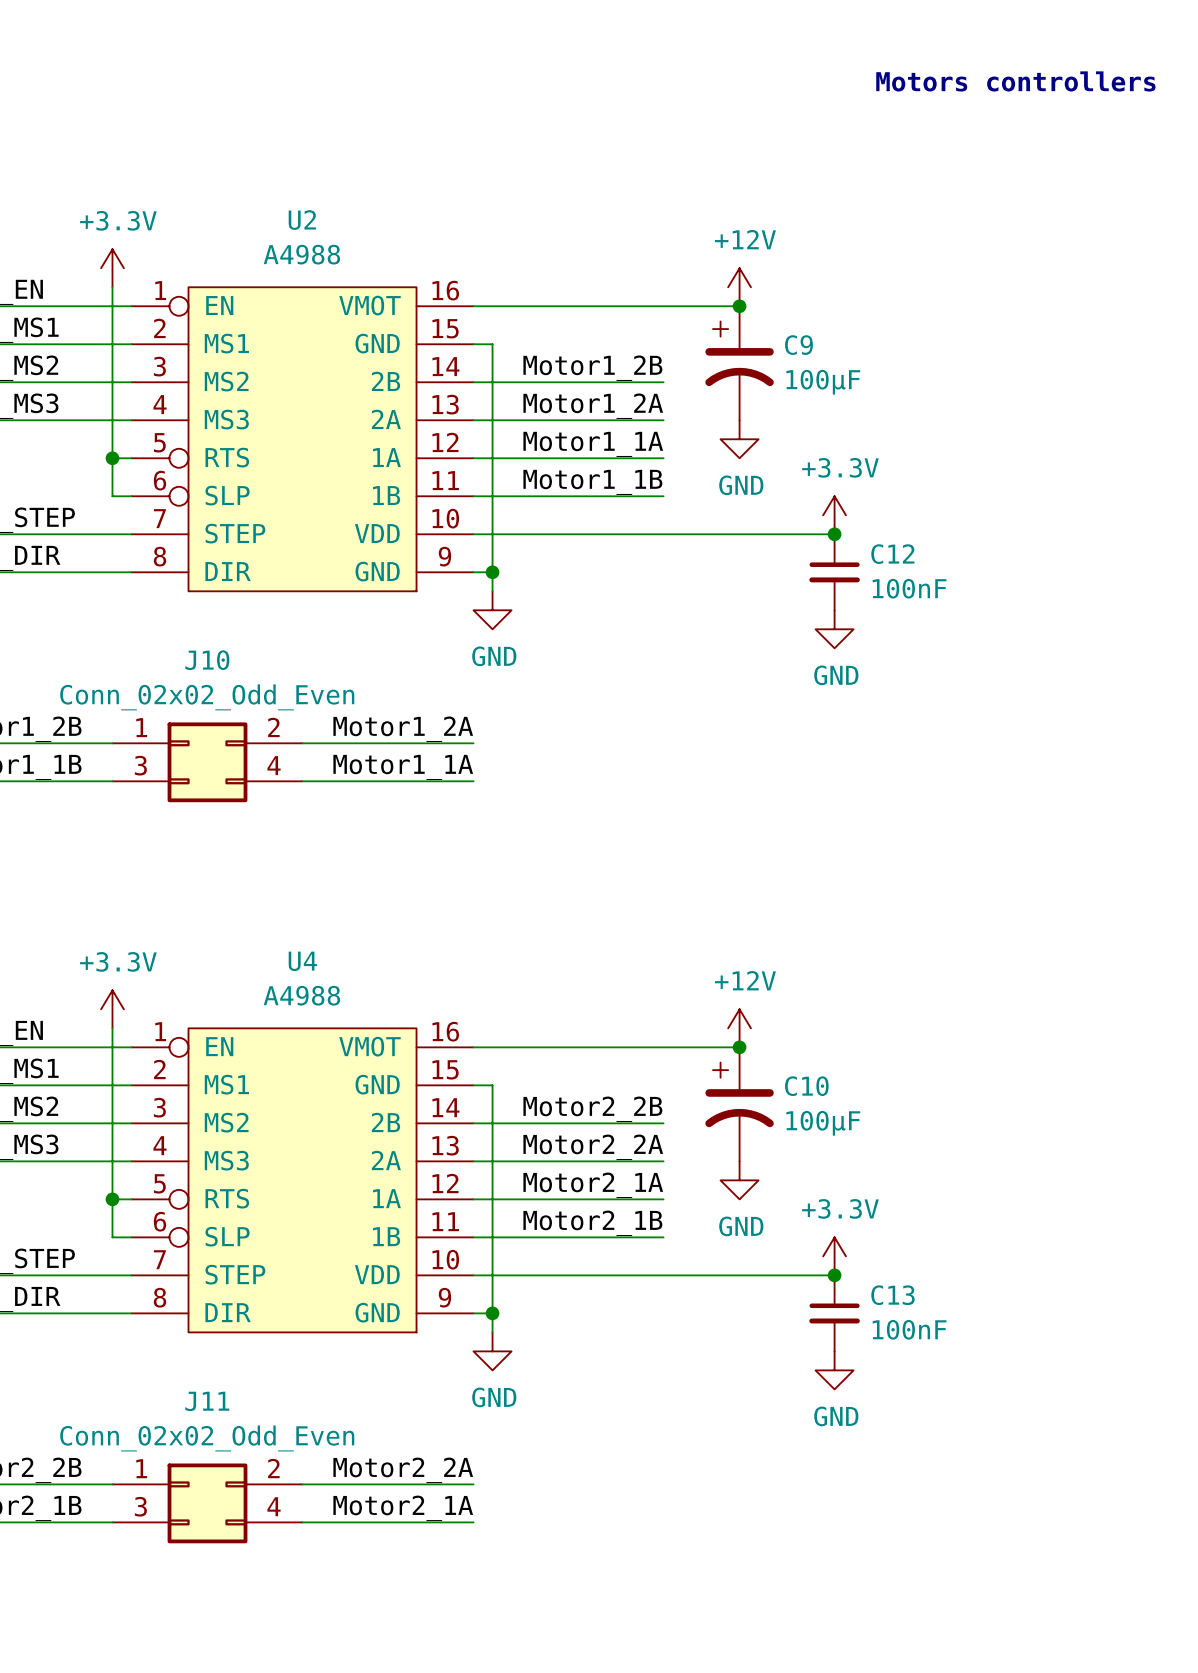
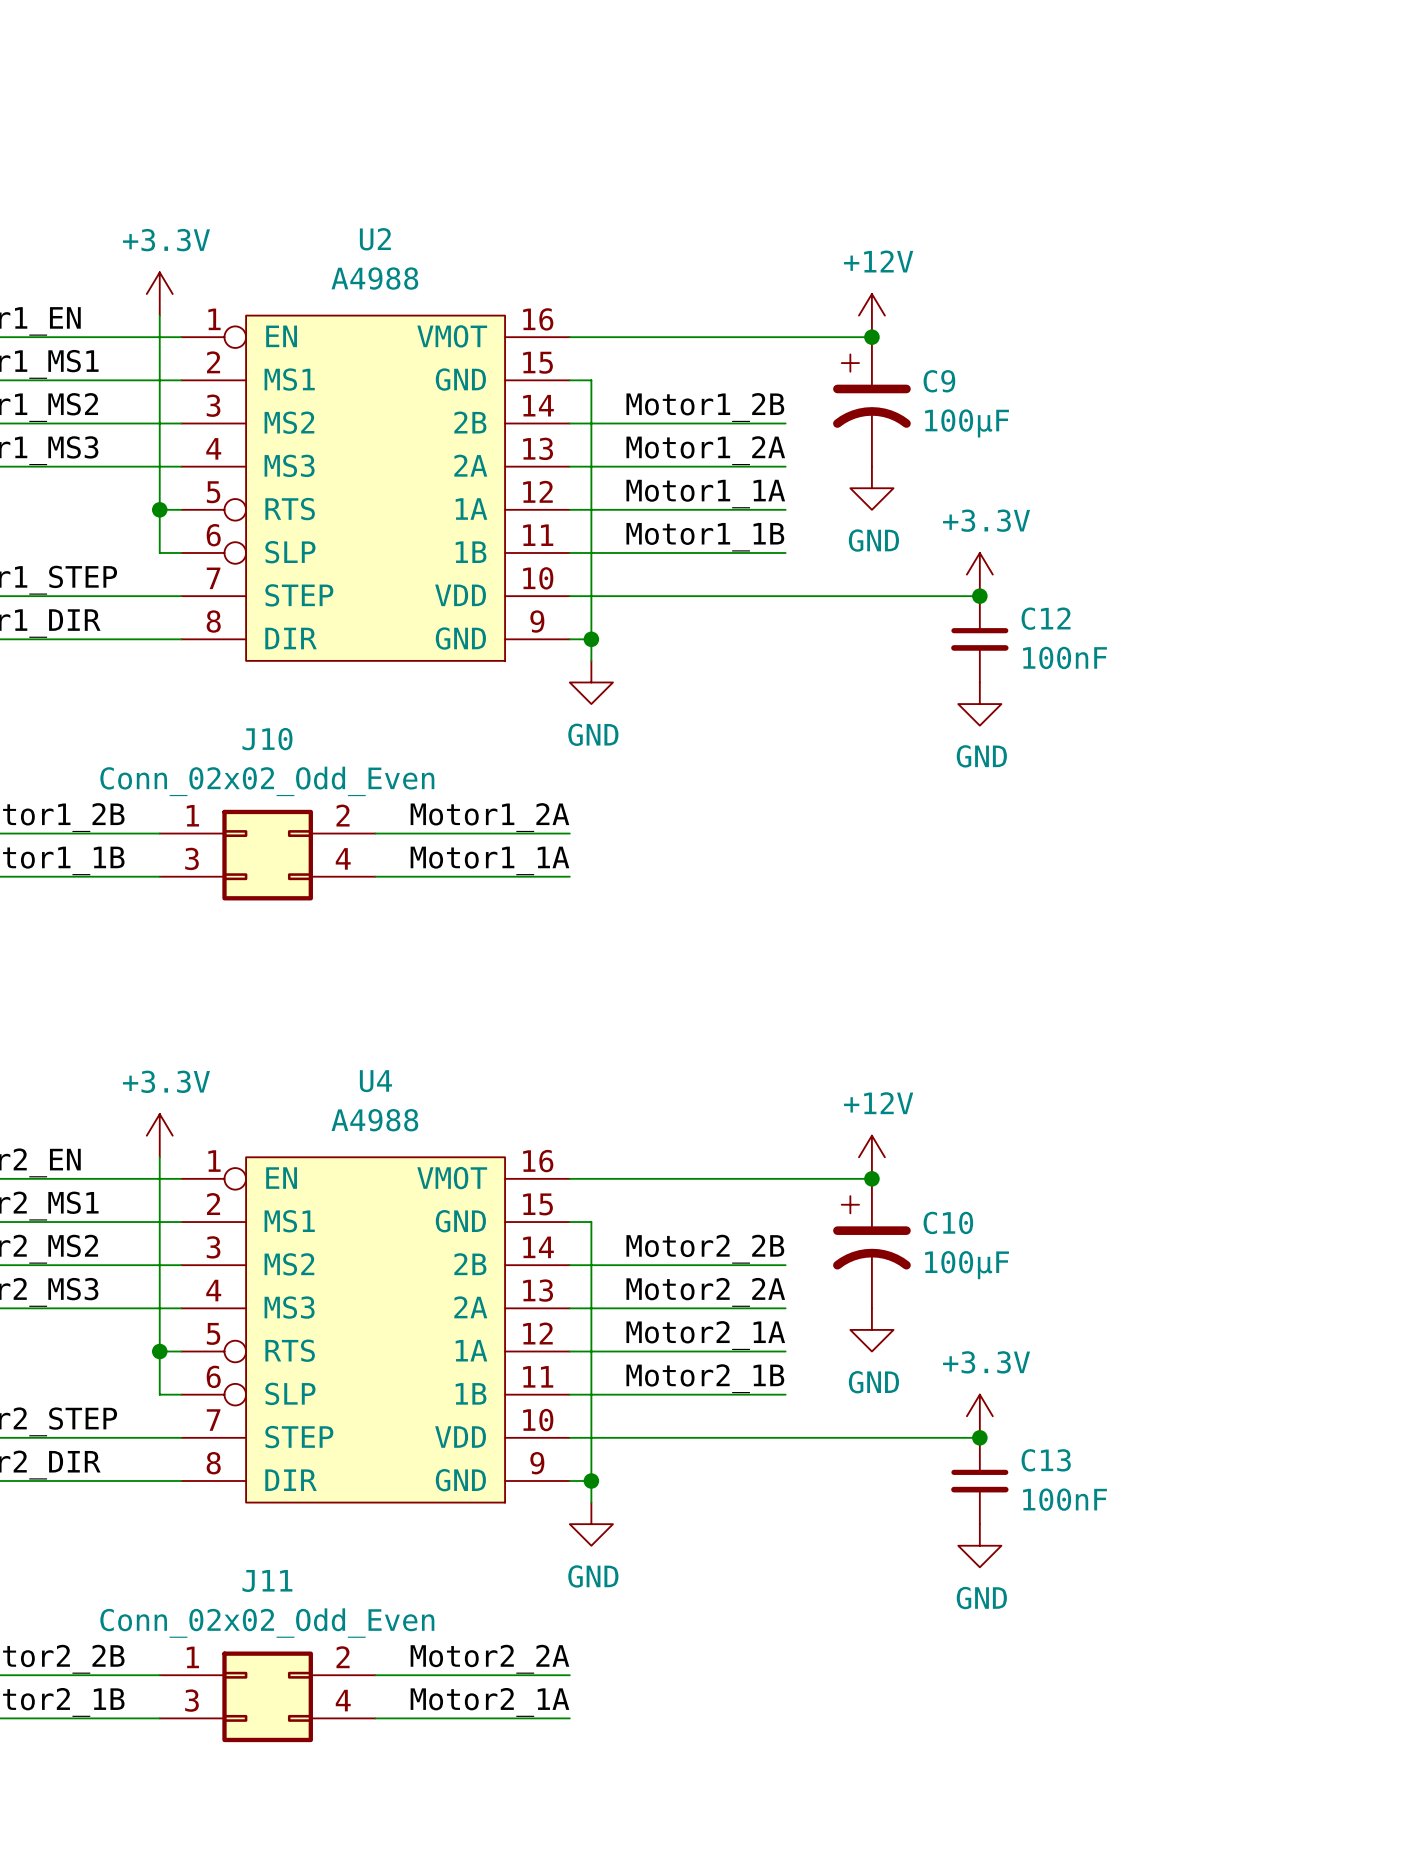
text: Motors controllers (1015, 81) -> none

